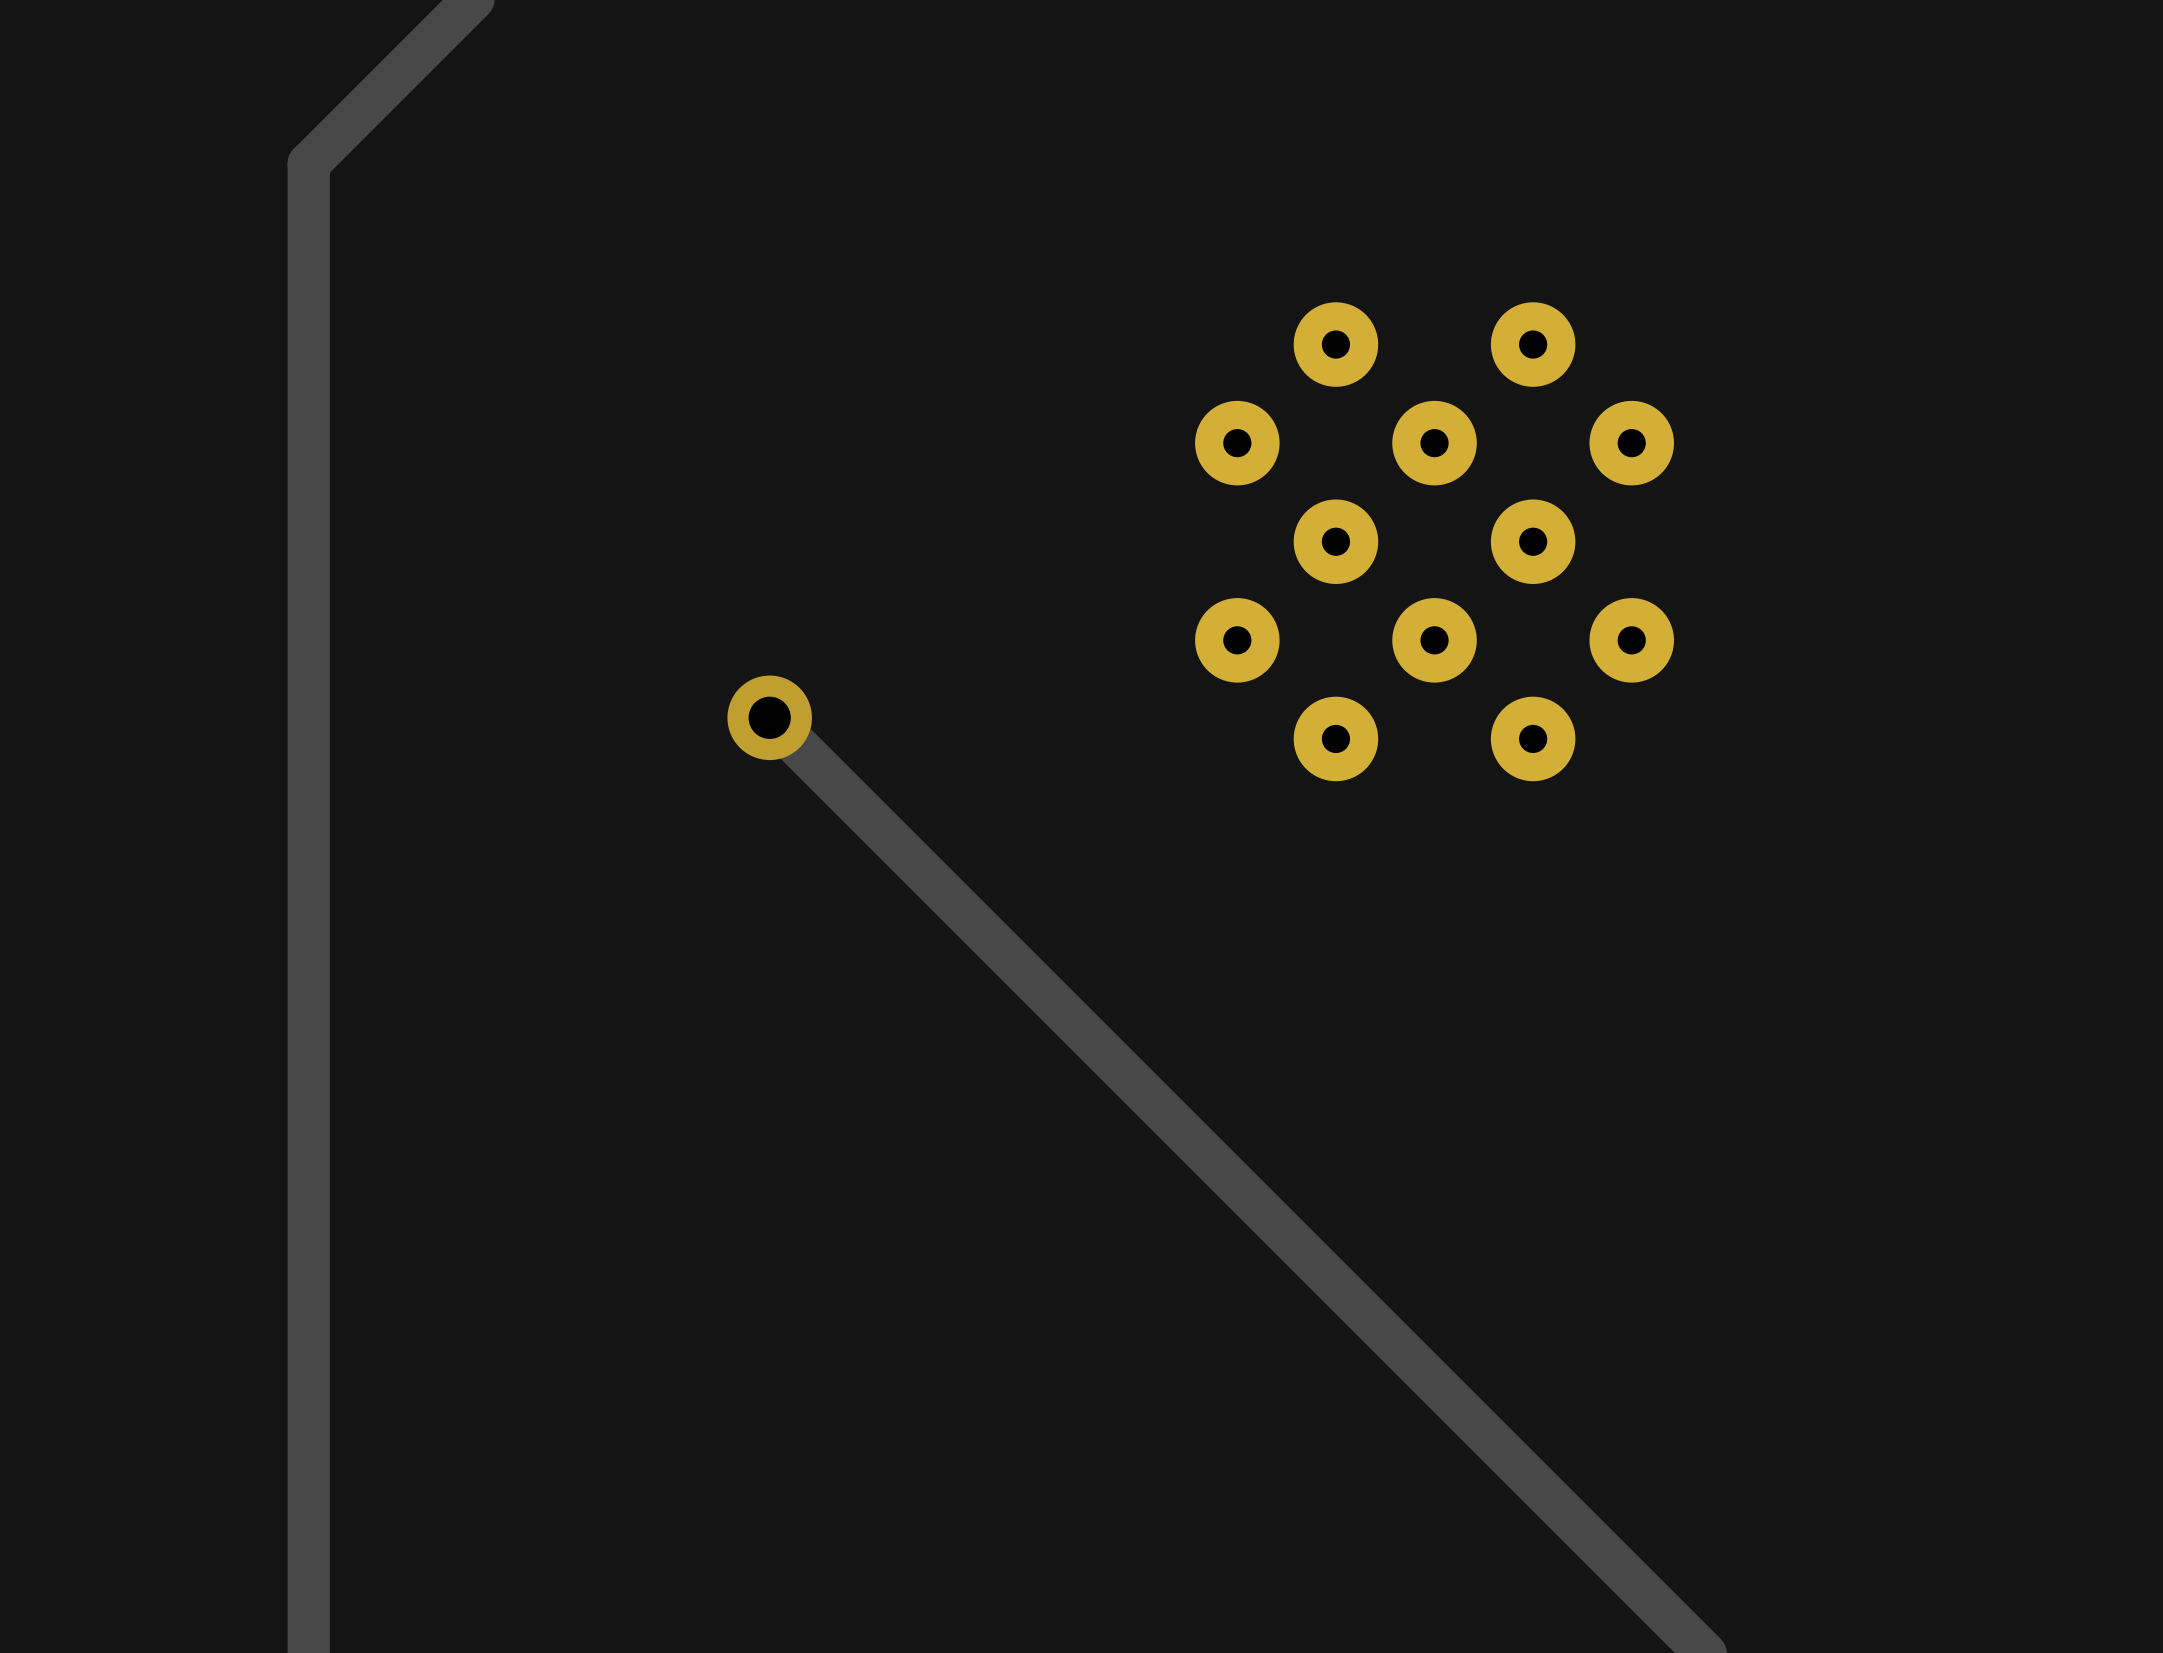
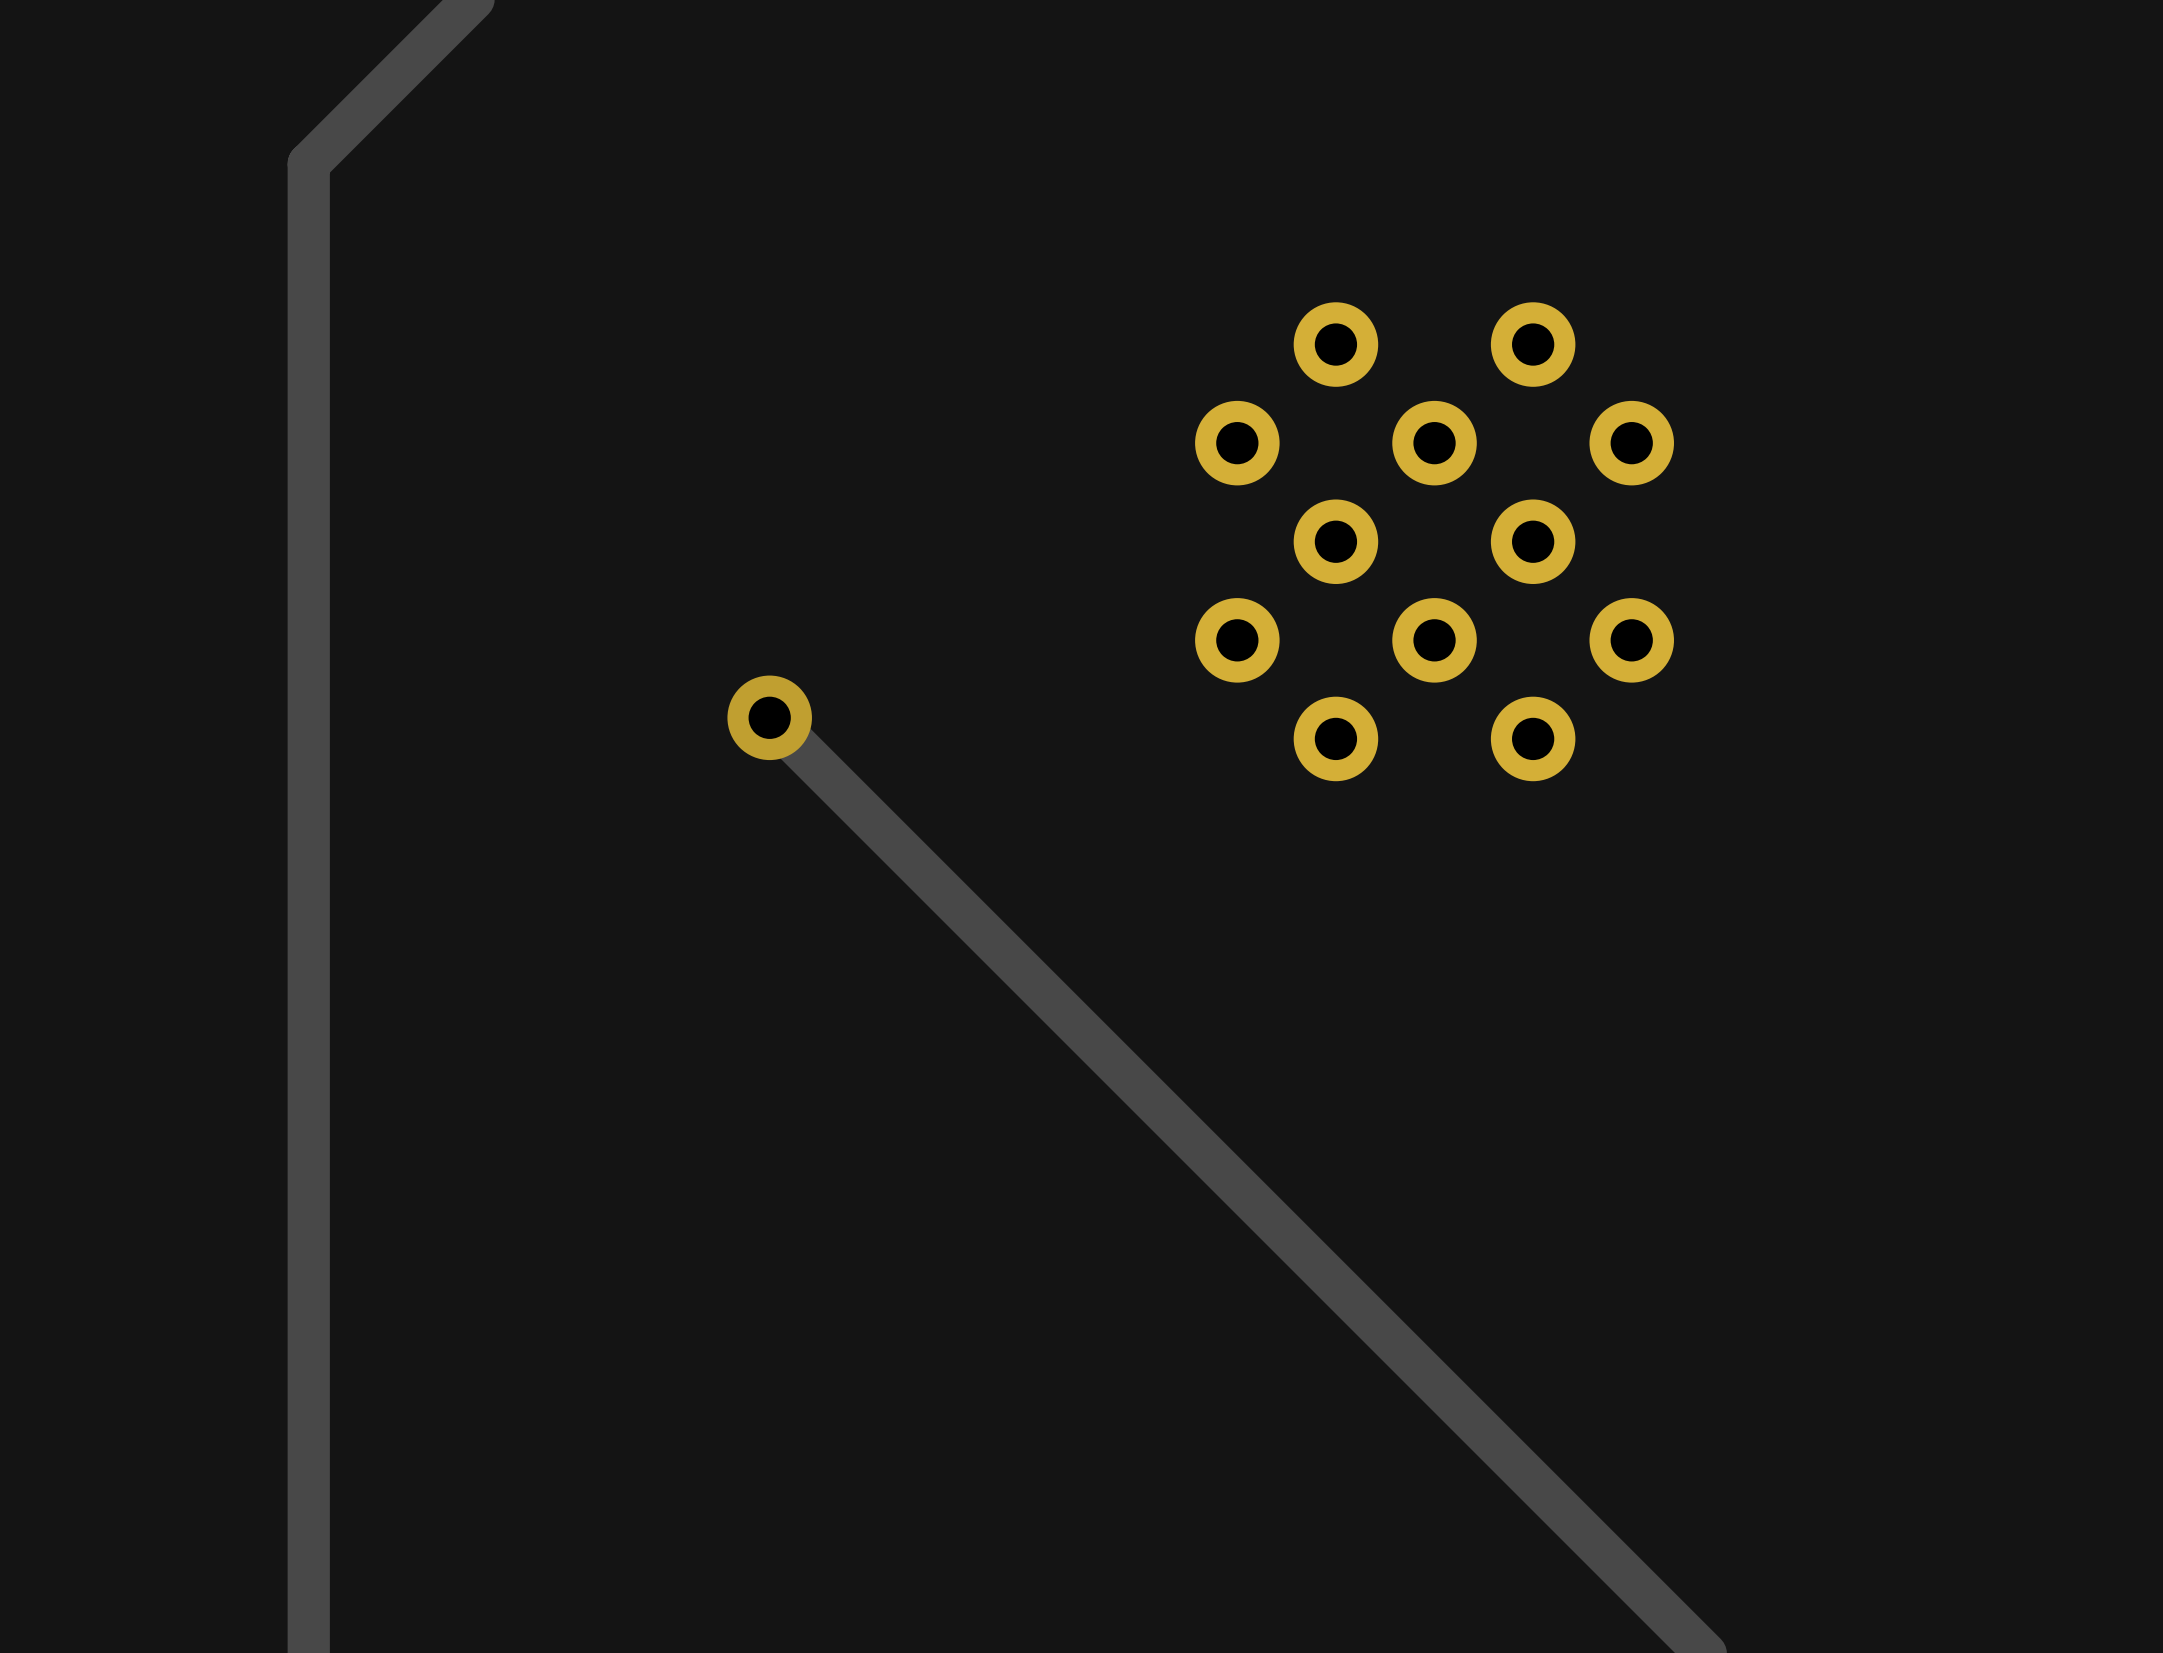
part footprint: [1195, 302, 1674, 782] -> [1195, 302, 1674, 782]

